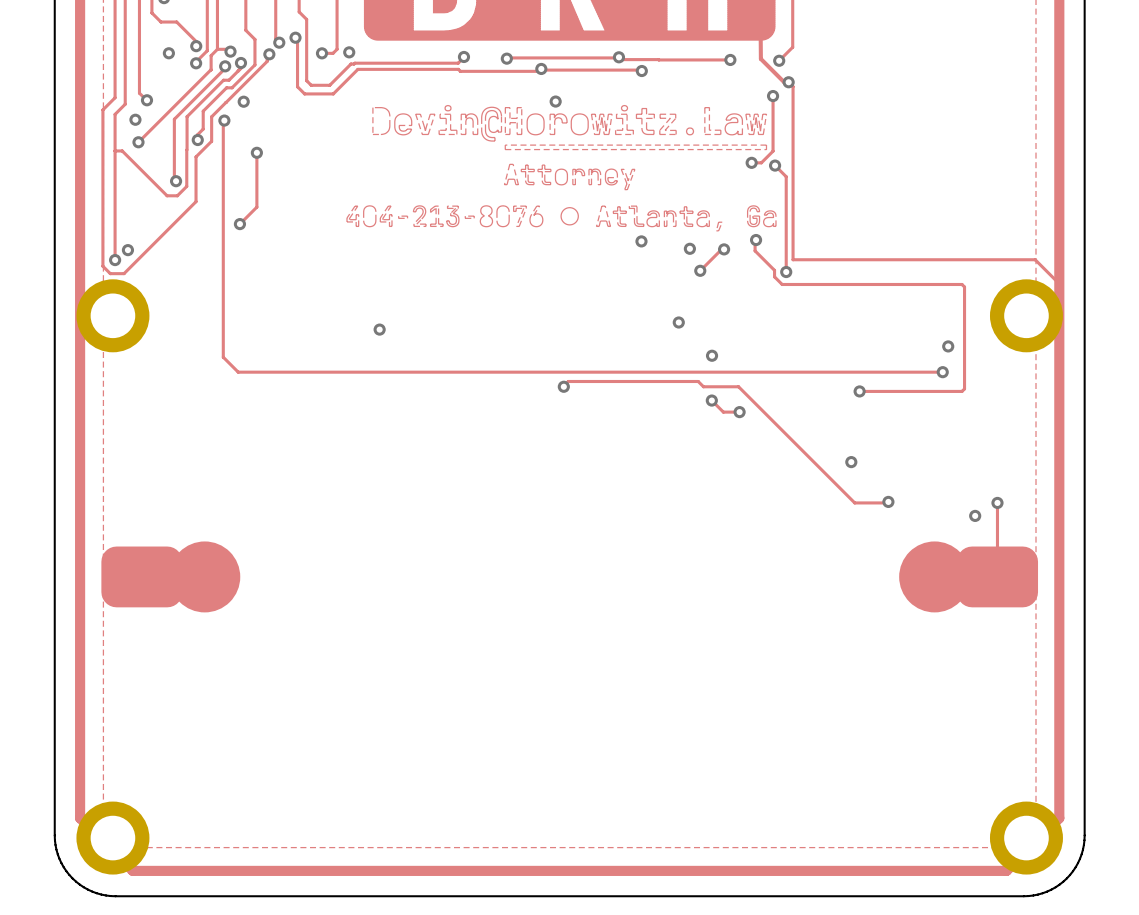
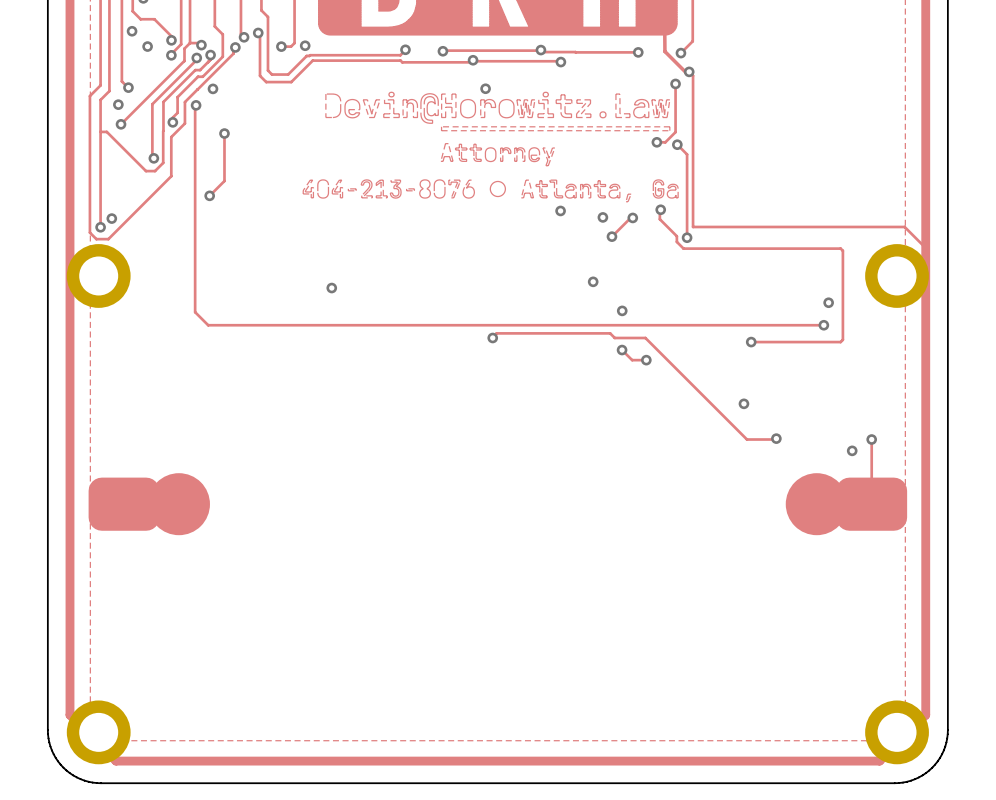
via: none -> (132, 31)

